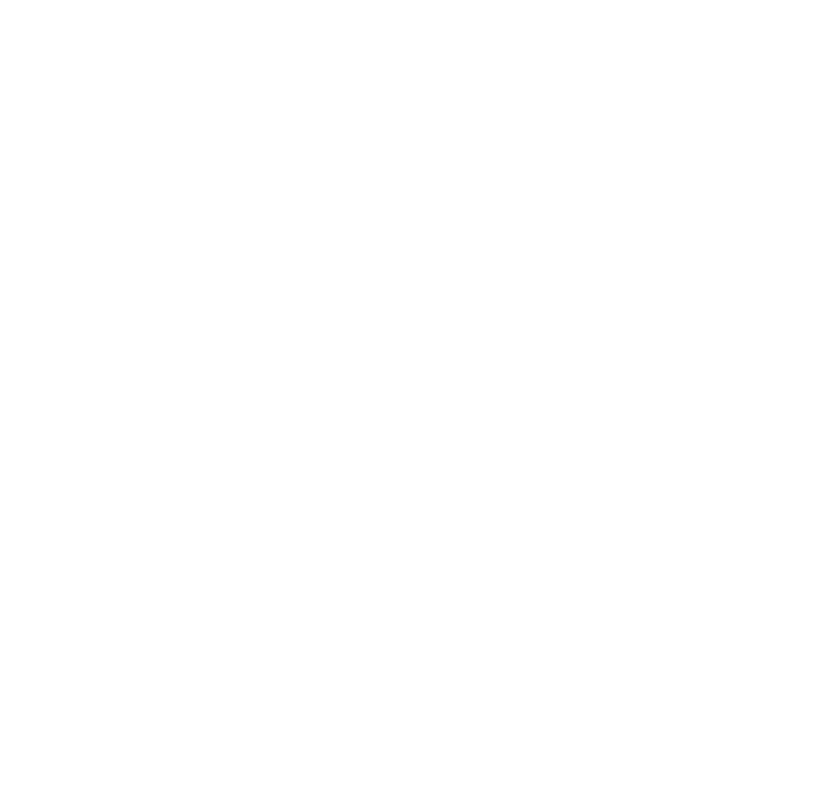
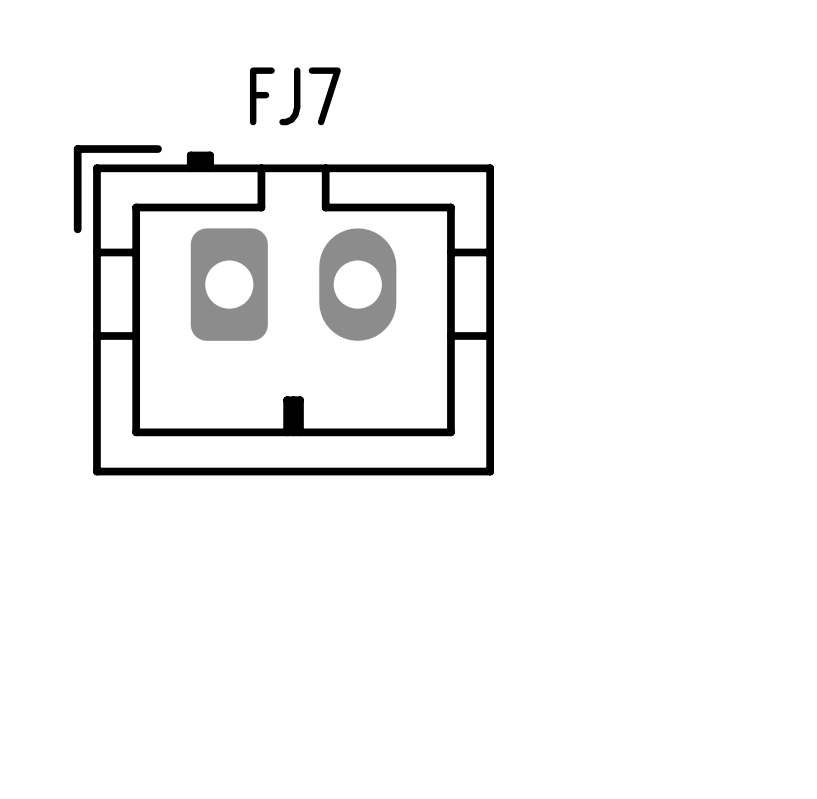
FJ7: none -> (283, 310)

